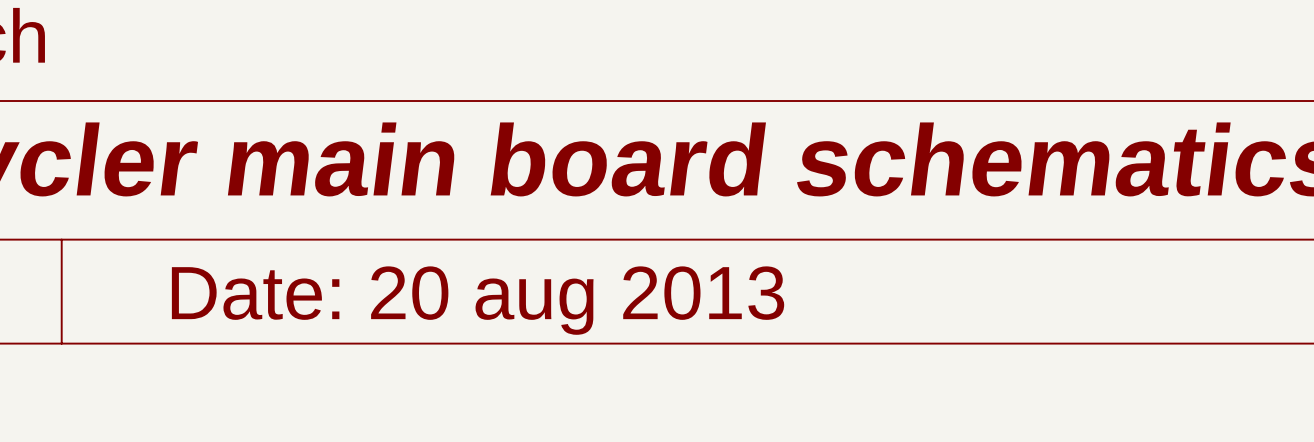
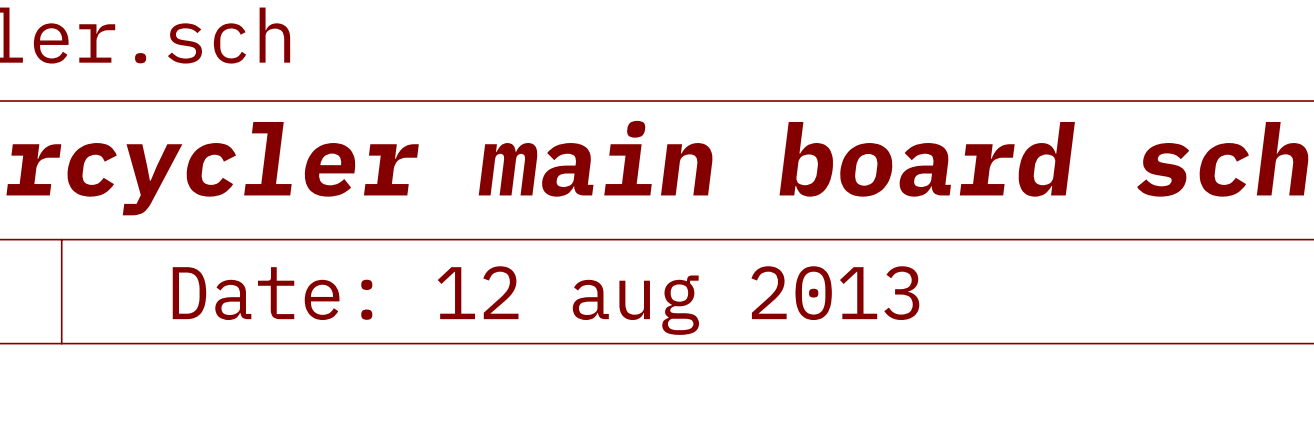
title block: Date: 20 aug 2013 (478, 300) -> Date: 12 aug 2013 (546, 300)

